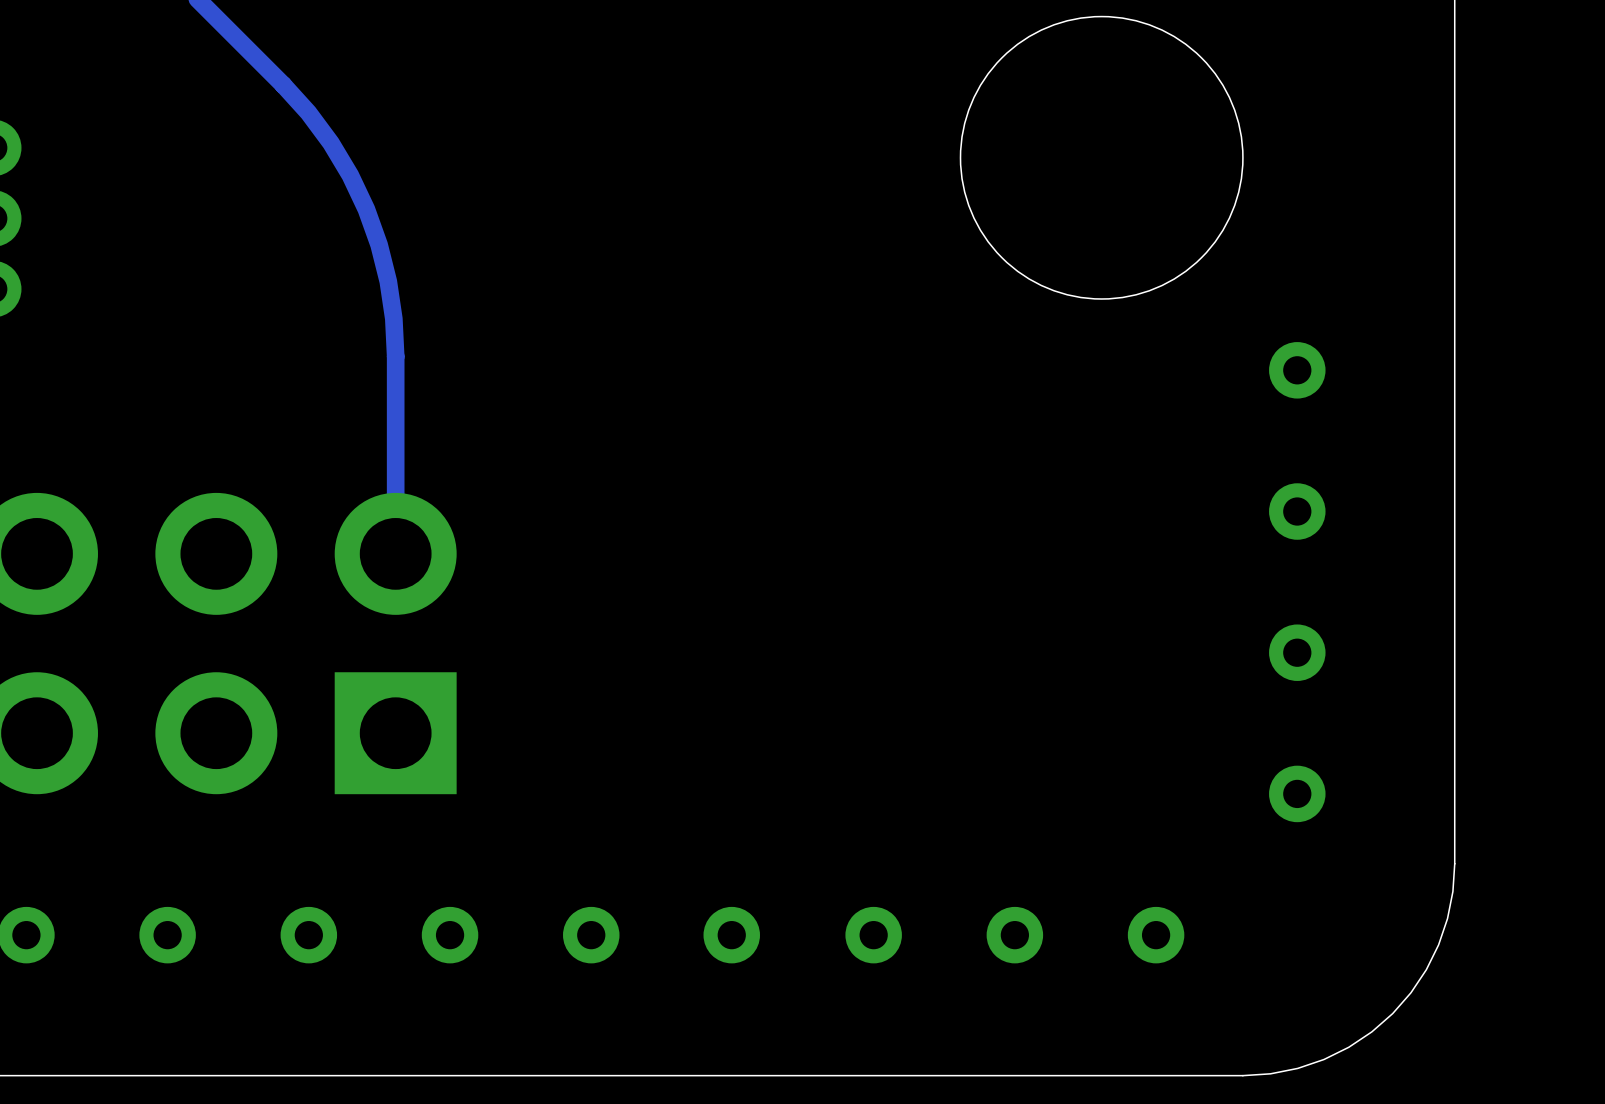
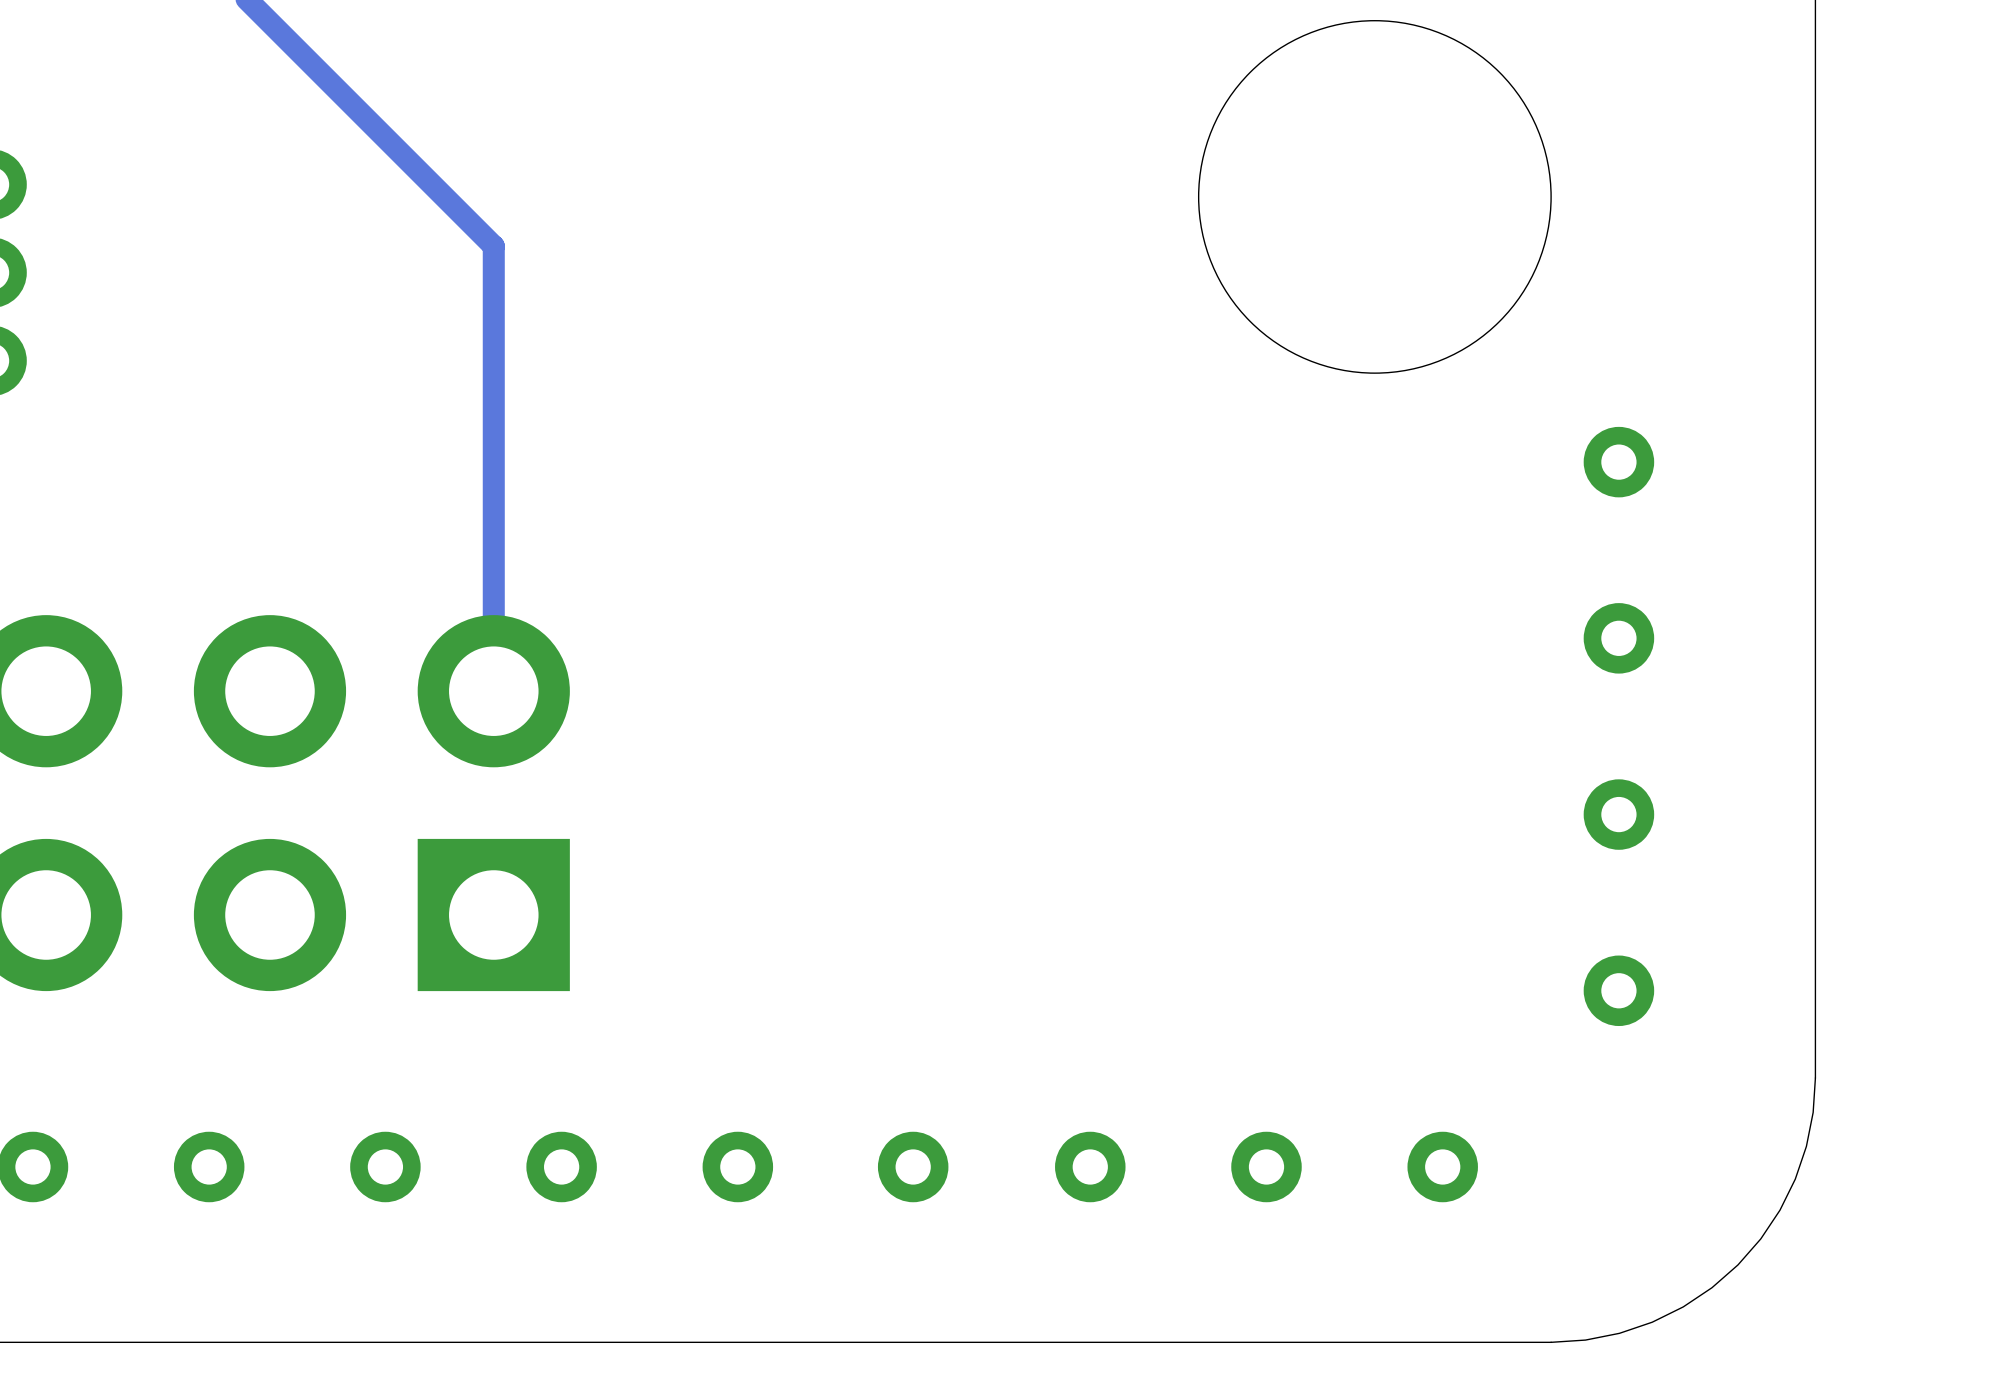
track: (283, 84) (308, 112) (330, 143) (350, 175) (366, 209) (379, 244) (388, 281) (393, 318) (395, 356) -> (353, 105) (493, 246) (493, 444)

